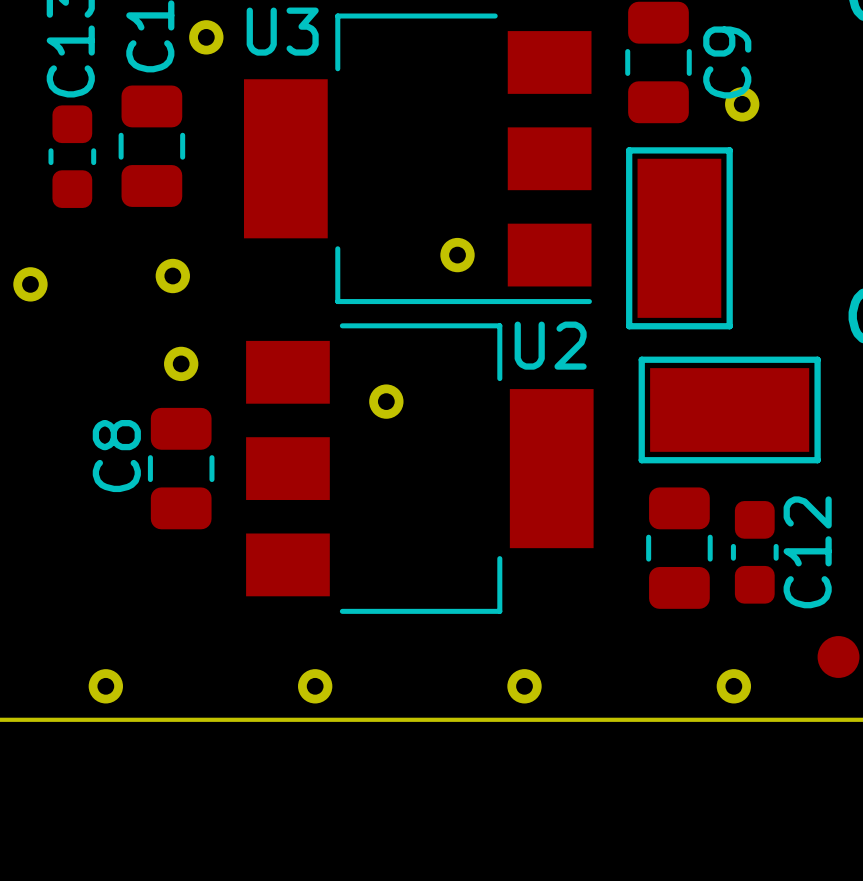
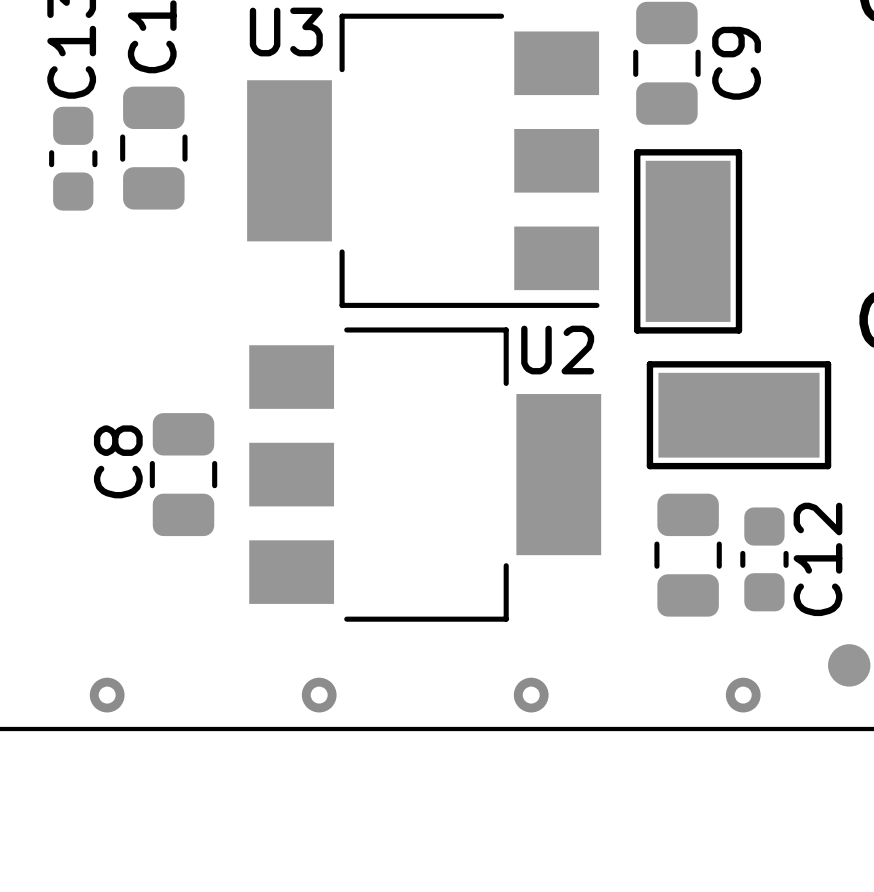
part: (206, 37) -> none
part: (742, 104) -> none
part: (457, 255) -> none
part: (172, 276) -> none
part: (30, 284) -> none
part: (181, 363) -> none
part: (386, 401) -> none

